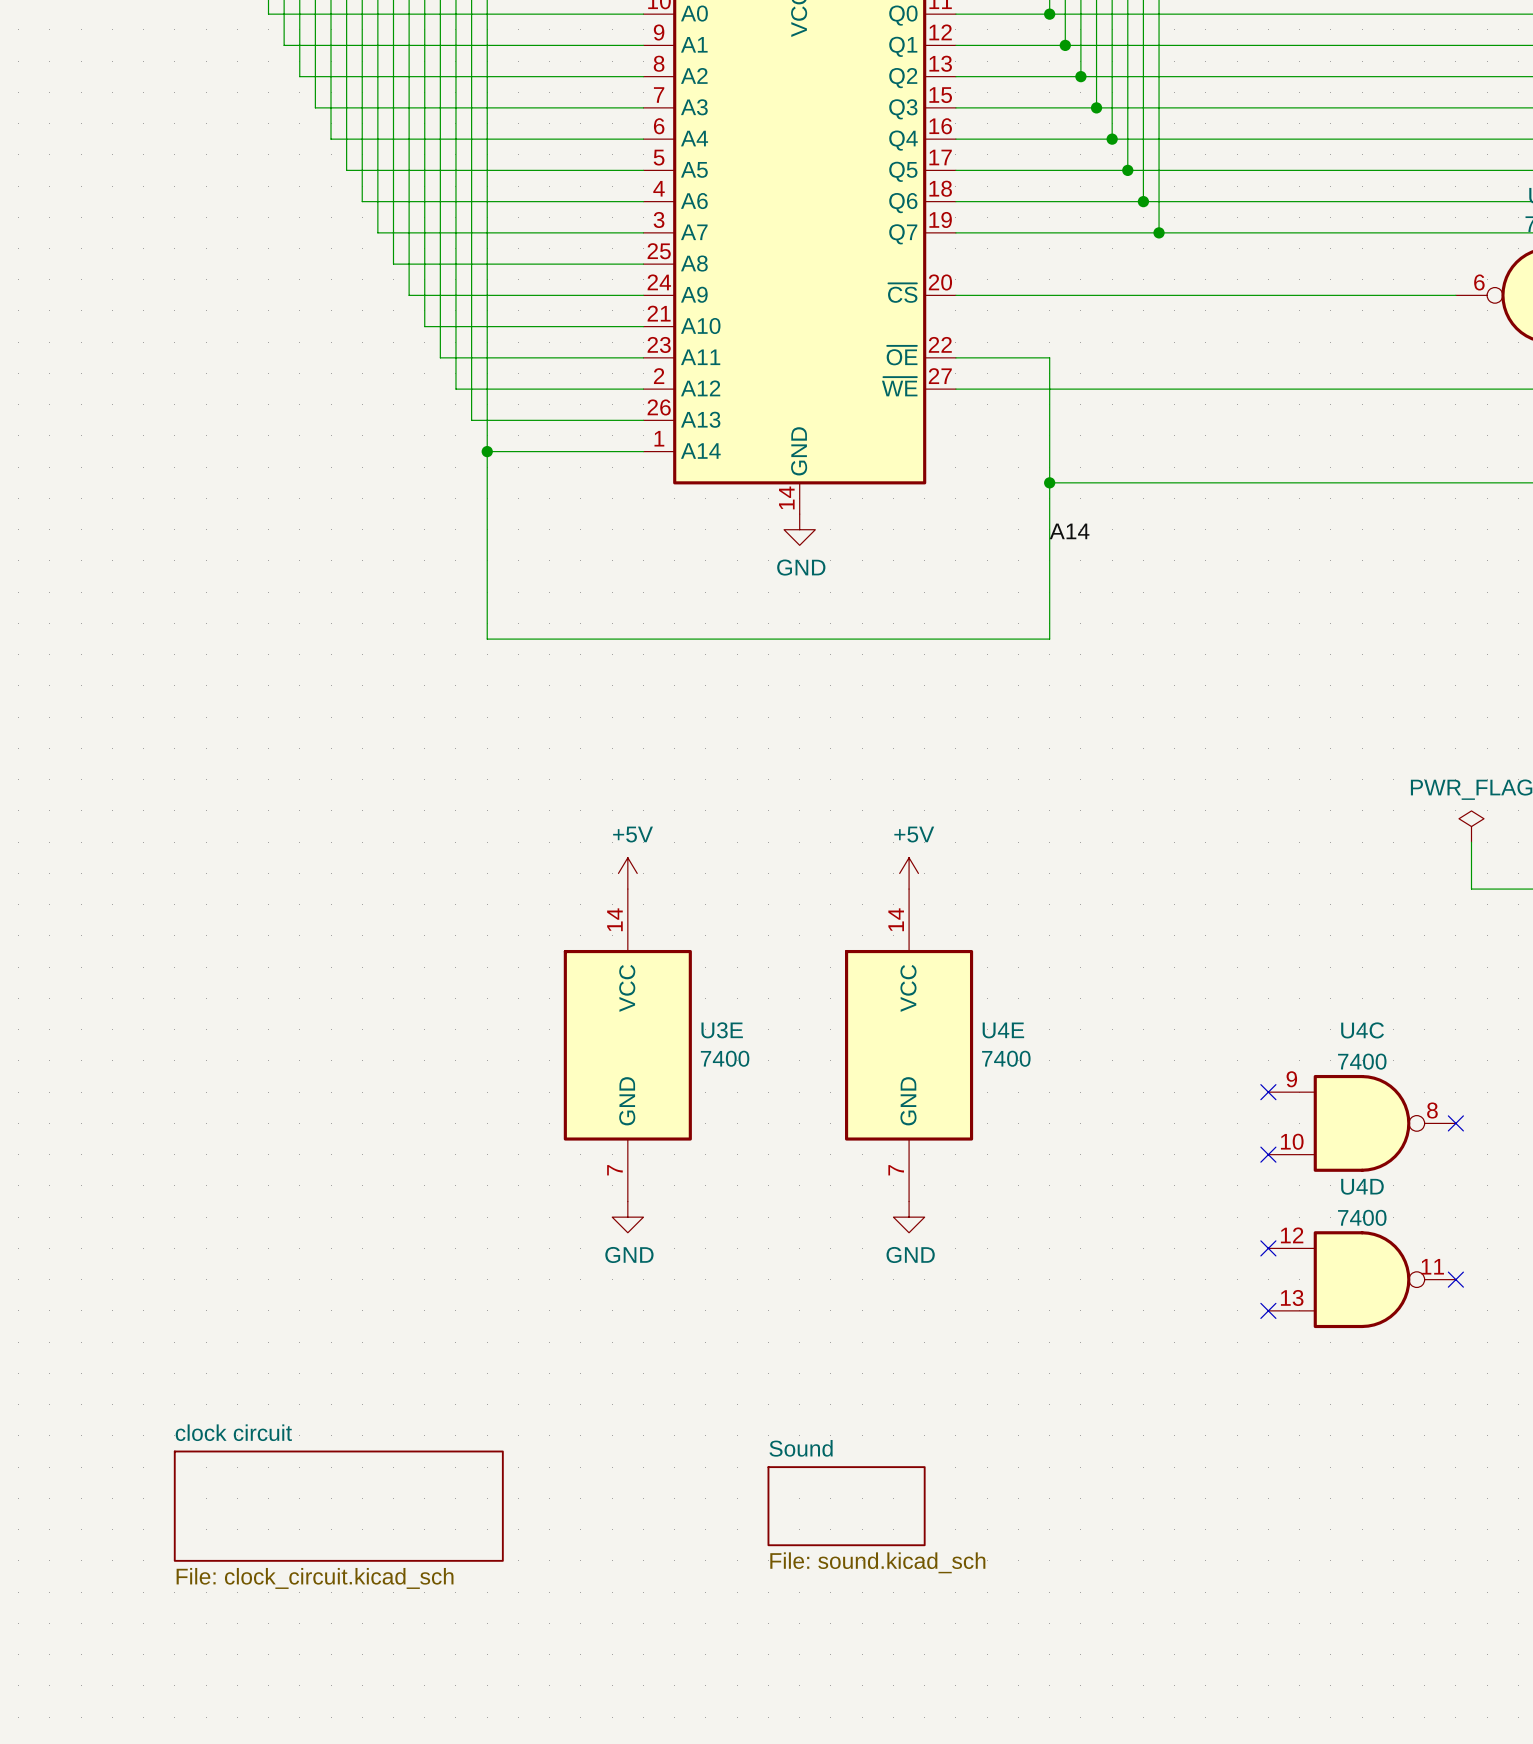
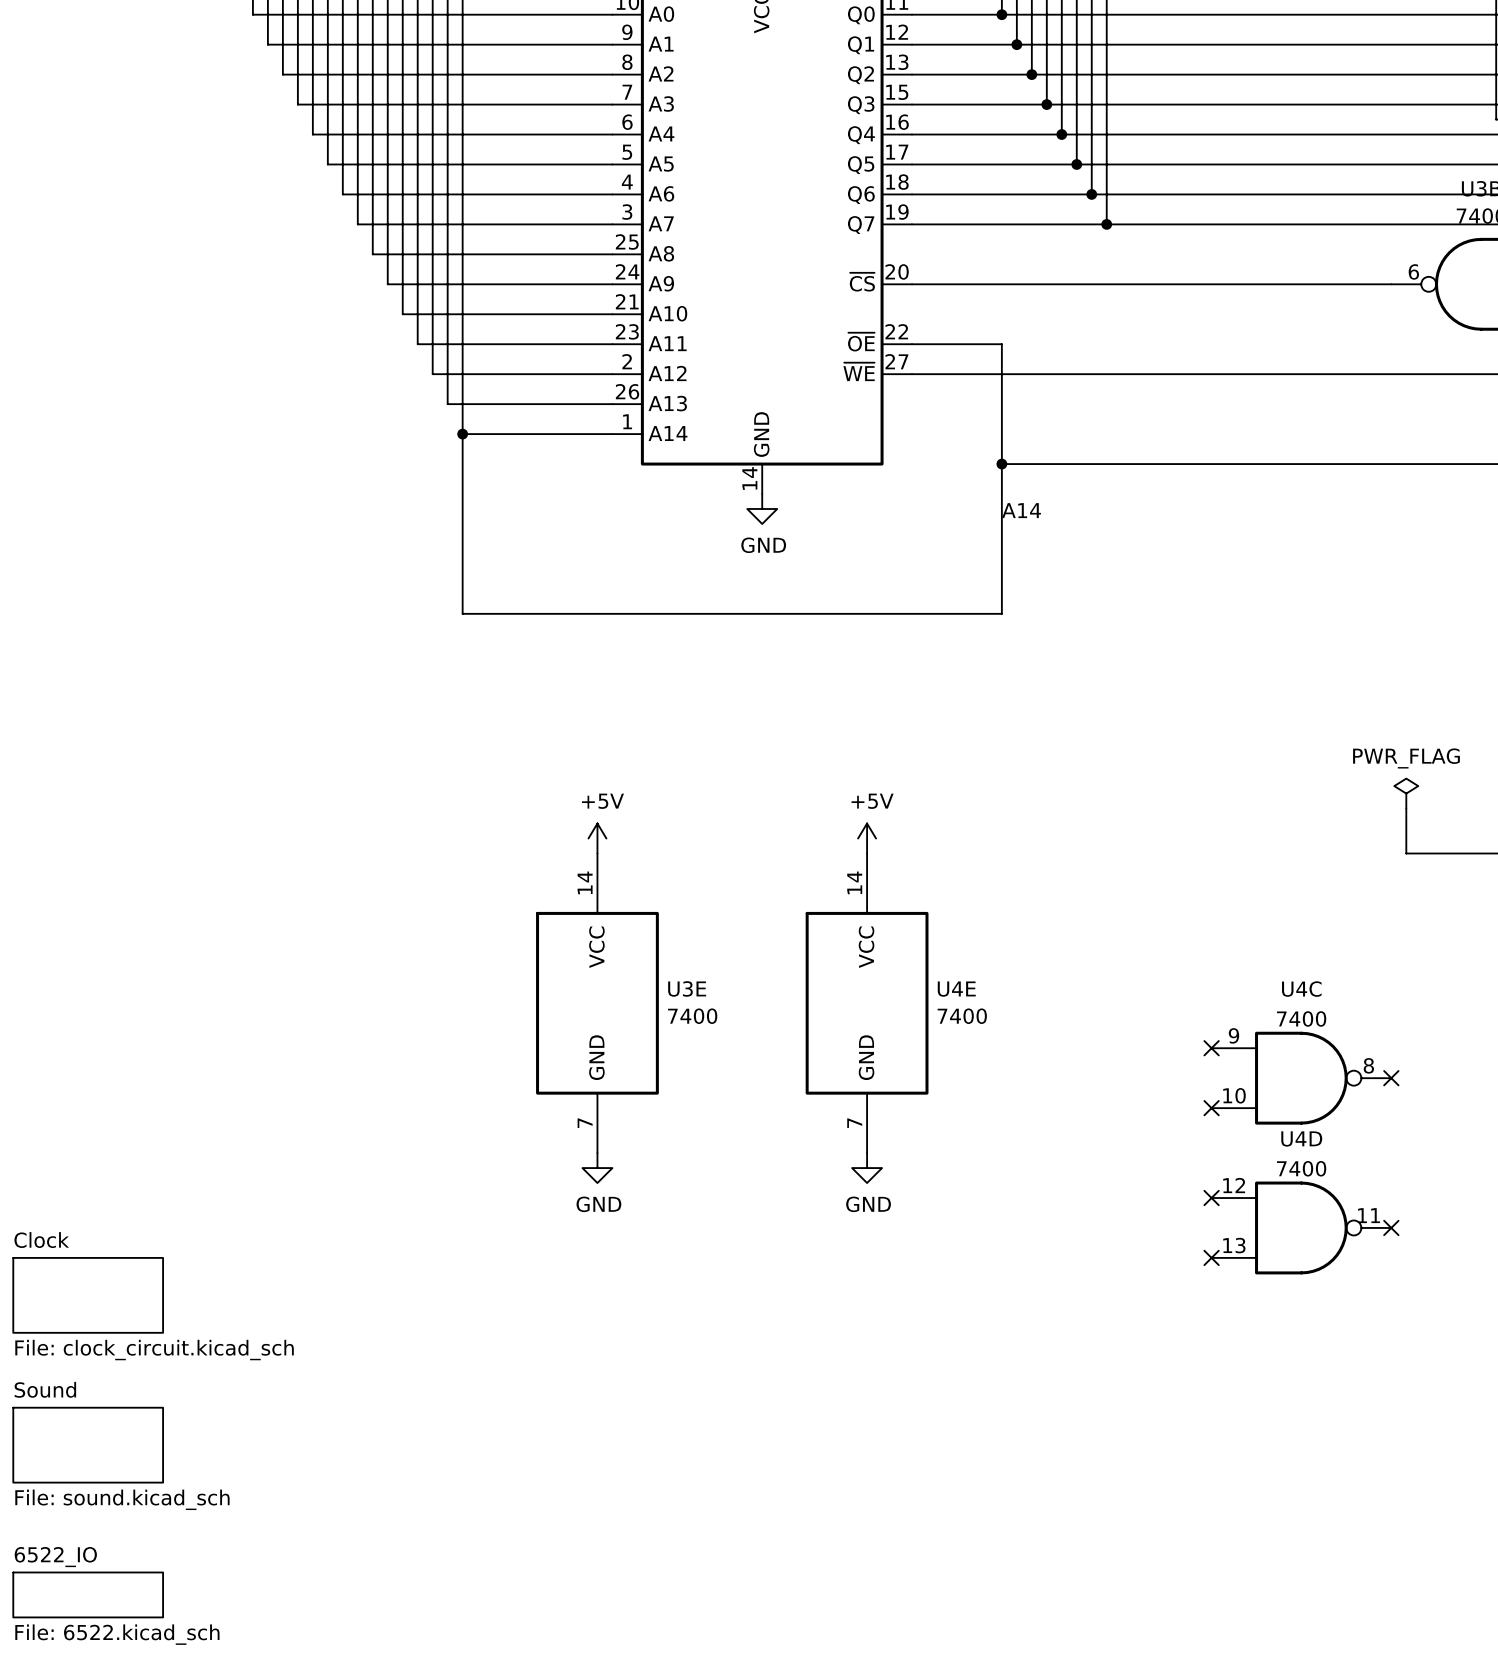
sheet Clock: none -> File: clock_circuit.kicad_sch (88, 1295)
sheet Sound: none -> File: sound.kicad_sch (88, 1445)
sheet clock circuit: File: clock_circuit.kicad_sch (338, 1506) -> none
sheet Sound: File: sound.kicad_sch (846, 1506) -> none
sheet 6522_IO: none -> File: 6522.kicad_sch (88, 1594)

